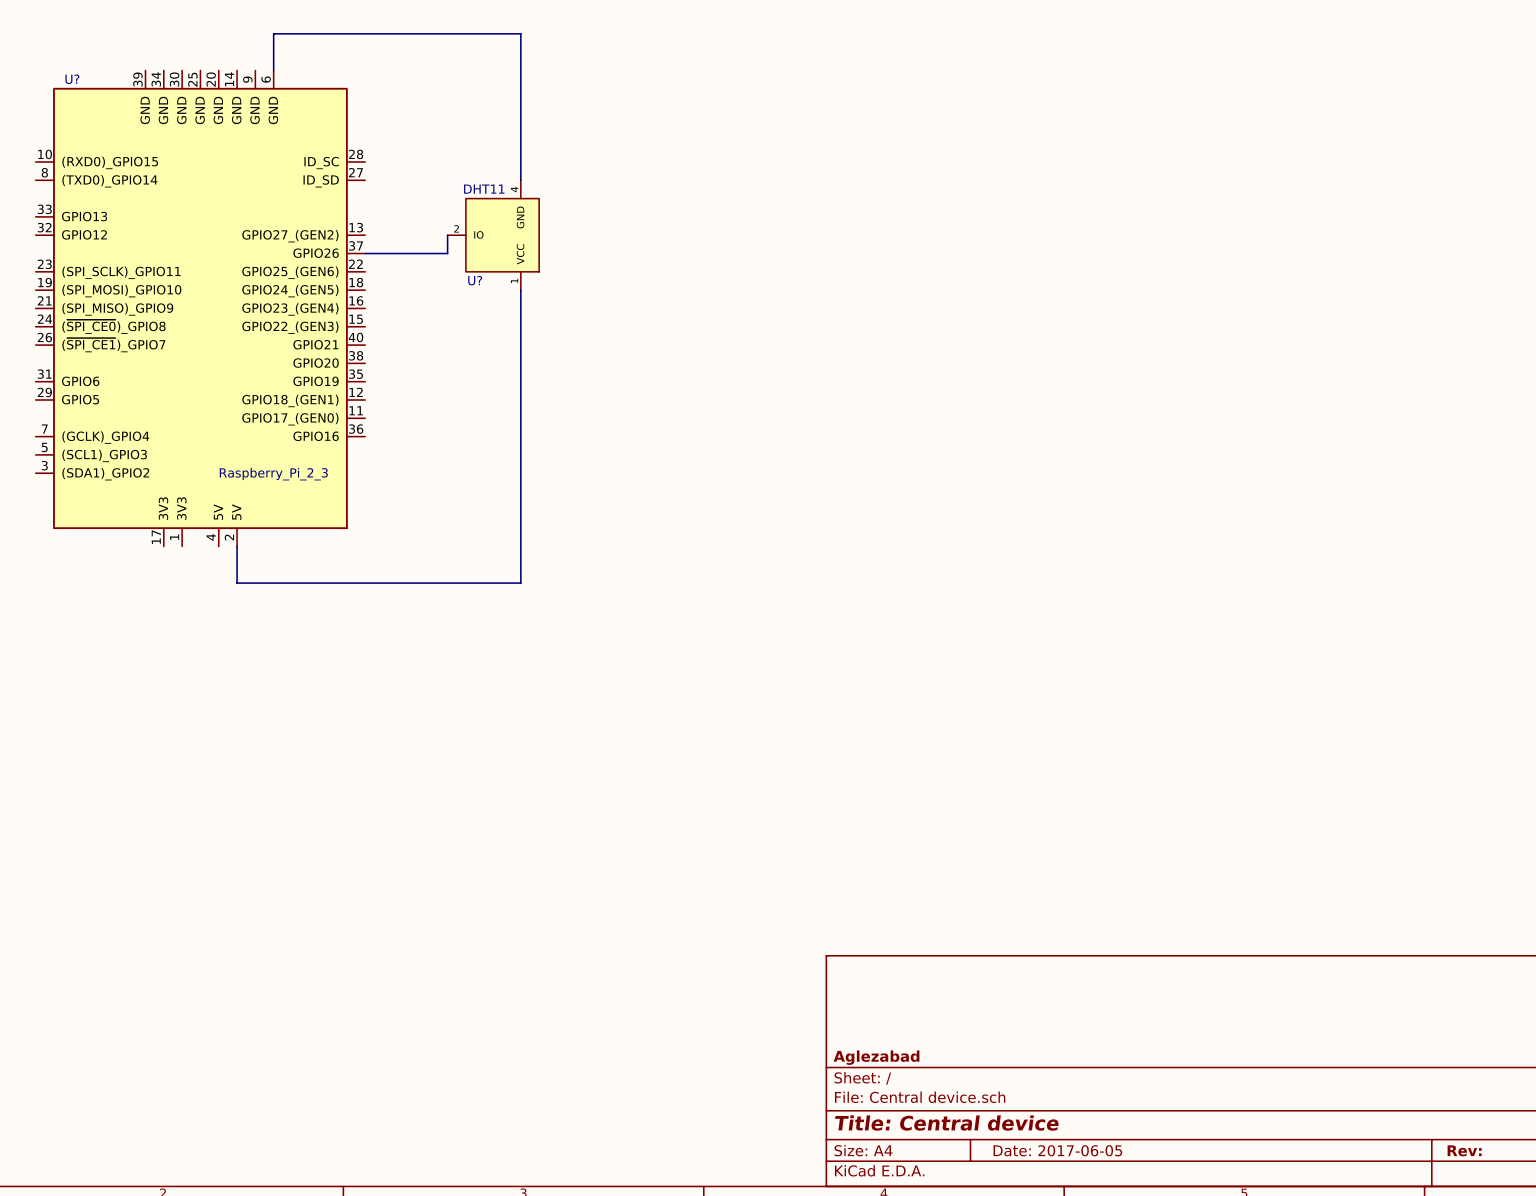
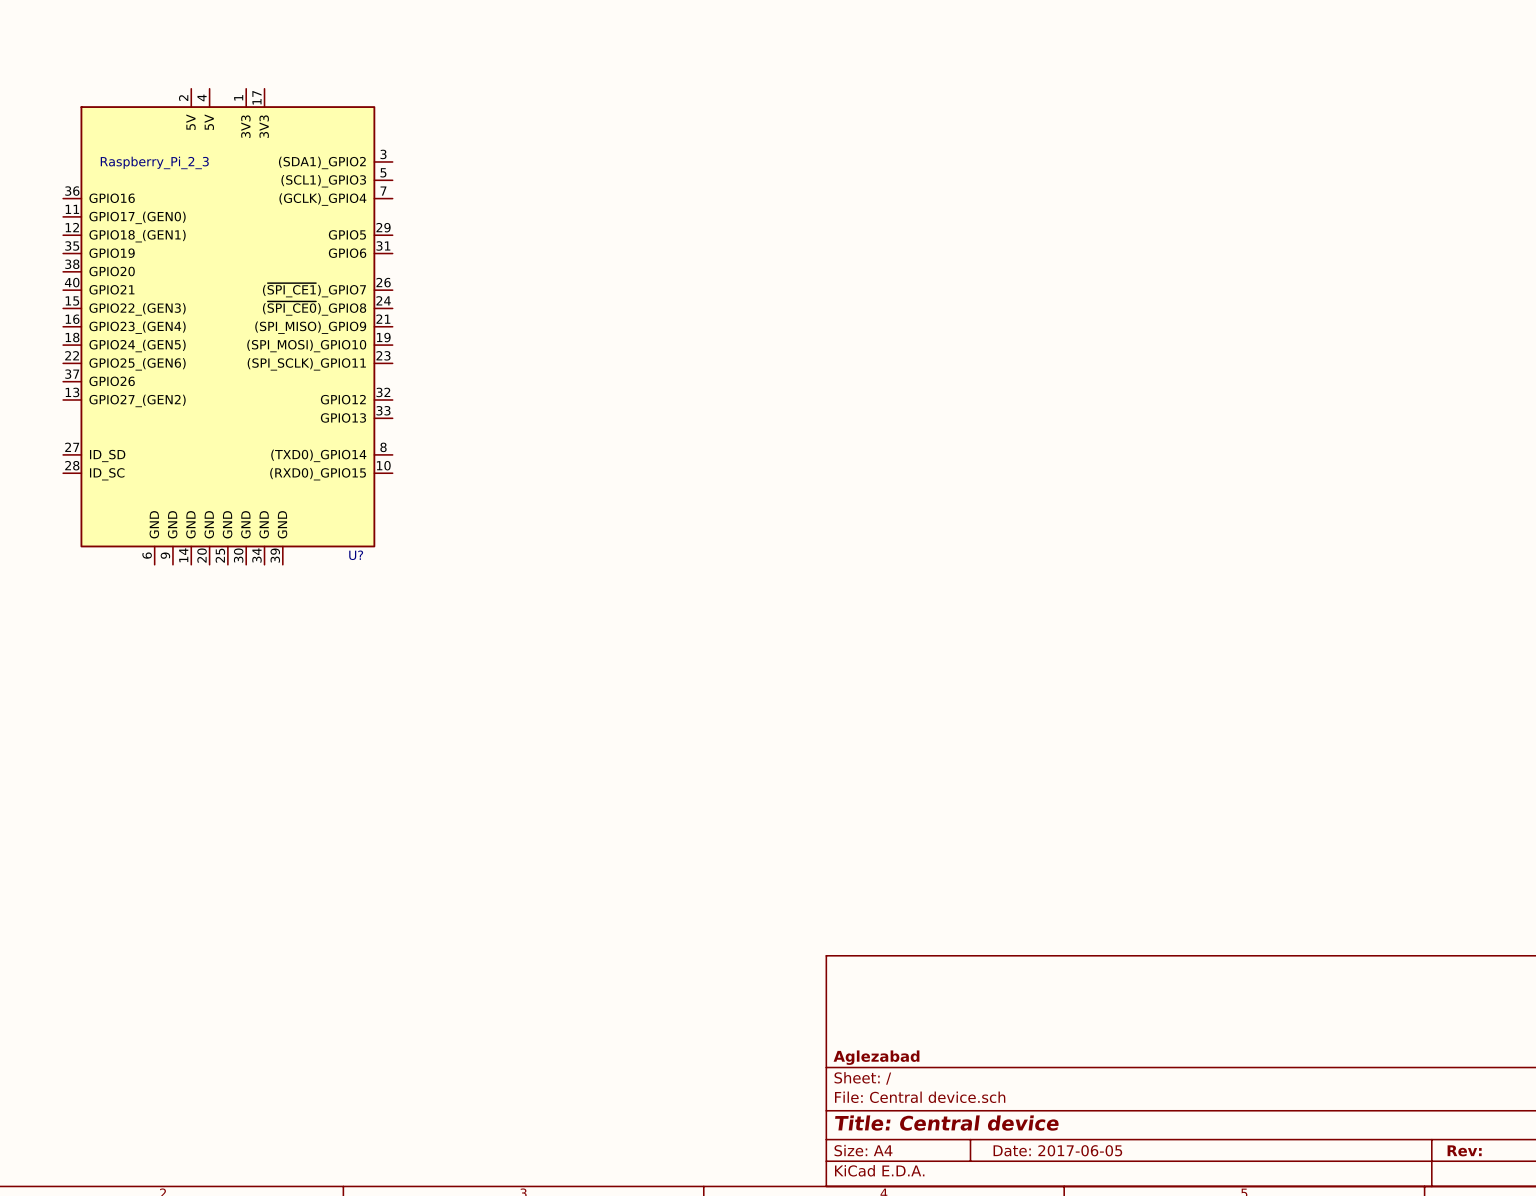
wire: (273, 70) (273, 33) (520, 33) (520, 180) -> none
wire: (447, 235) (447, 253) (365, 253) -> none
U?: DHT11 (493, 235) -> none
wire: (520, 290) (520, 583) (237, 583) (237, 546) -> none
U? rotation: 0° (200, 308) -> 180° (227, 326)

